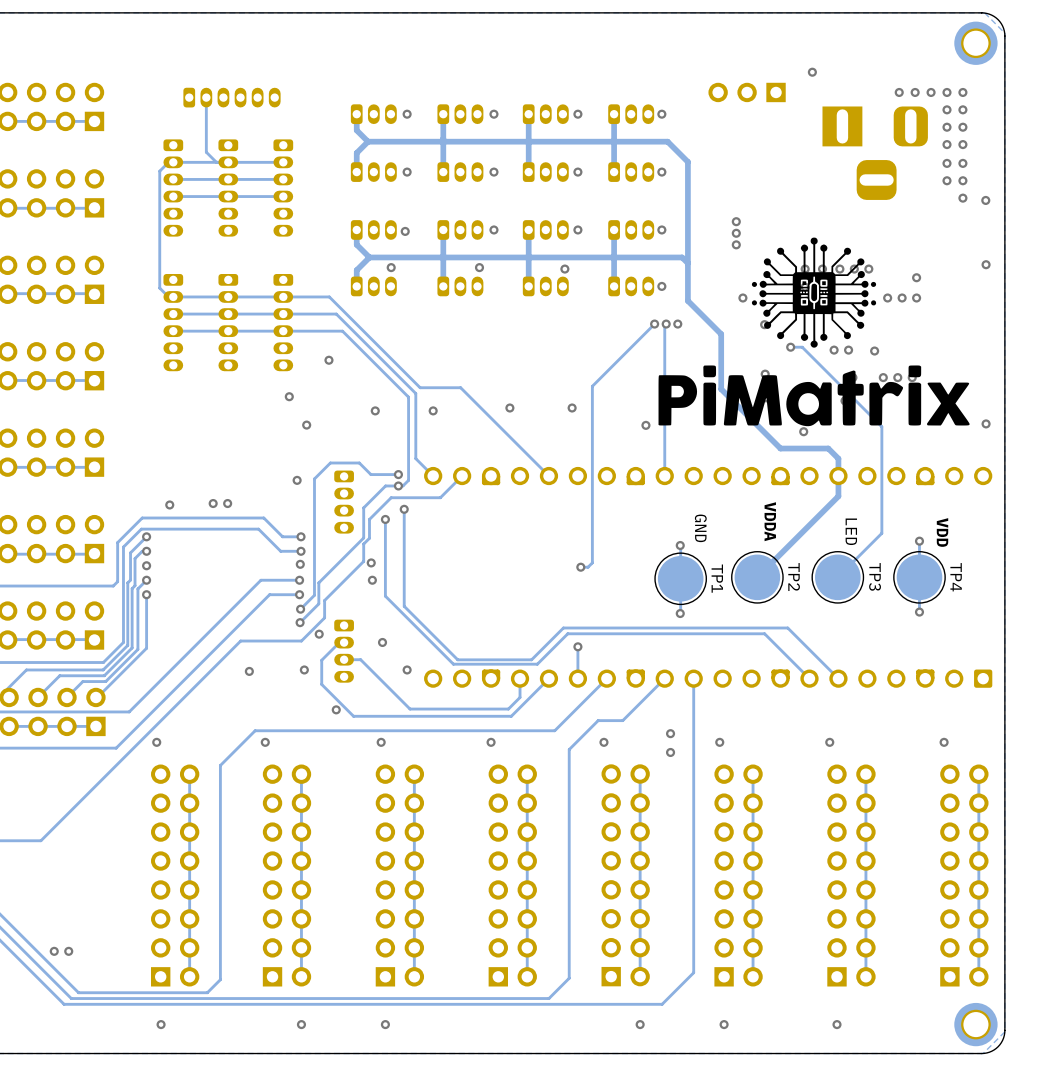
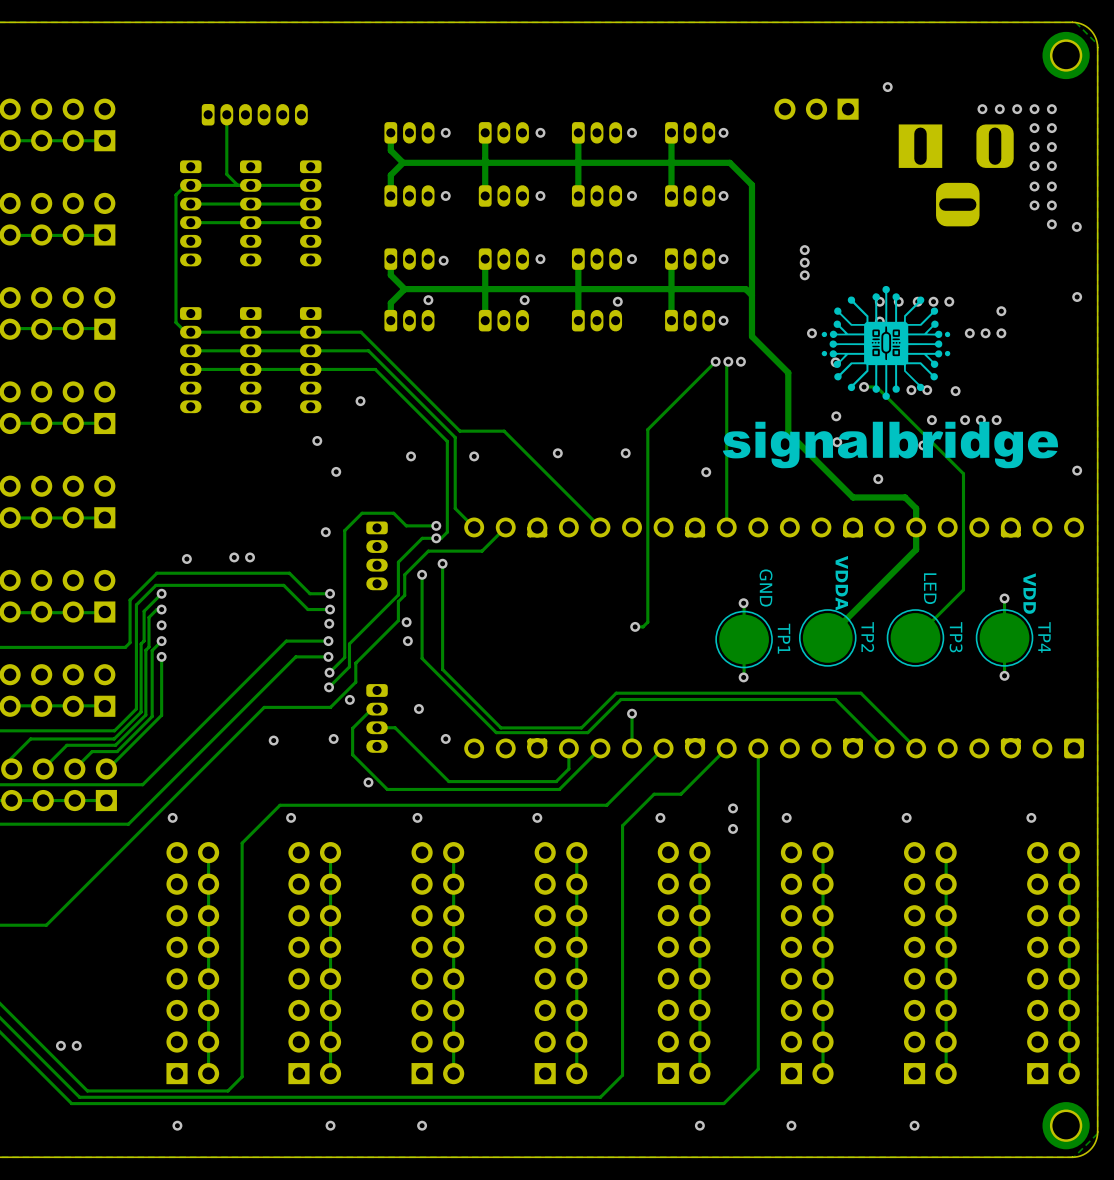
drawing shape: [658, 237, 970, 427] -> [722, 285, 1059, 469]

